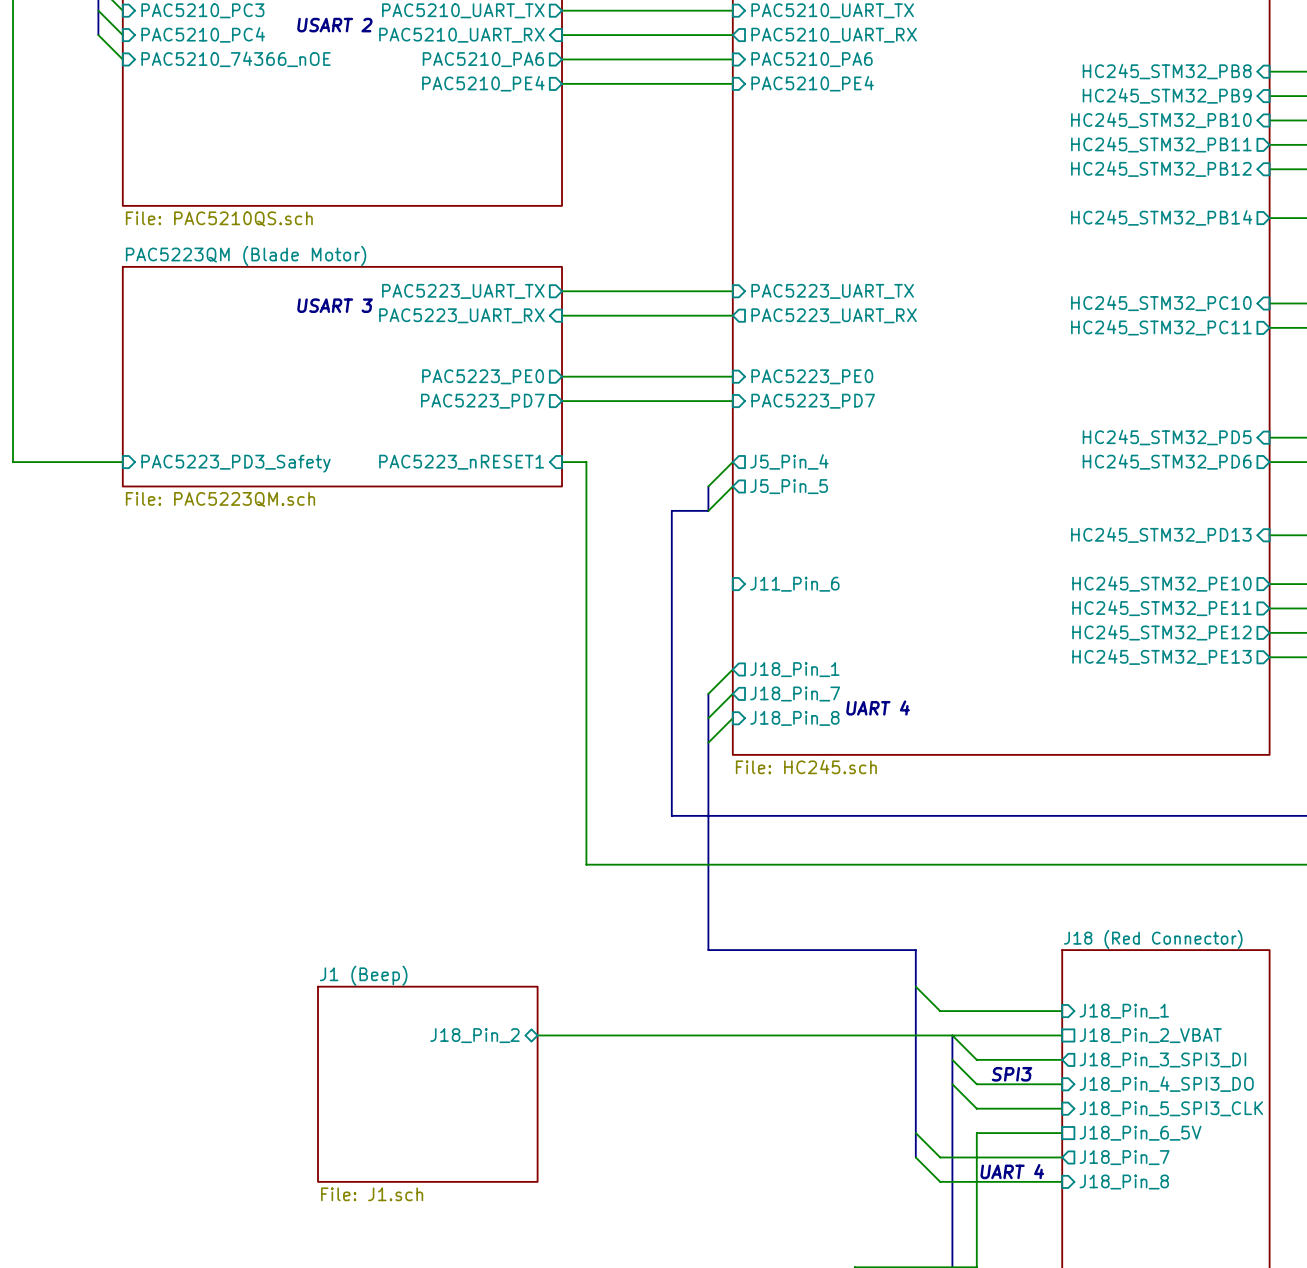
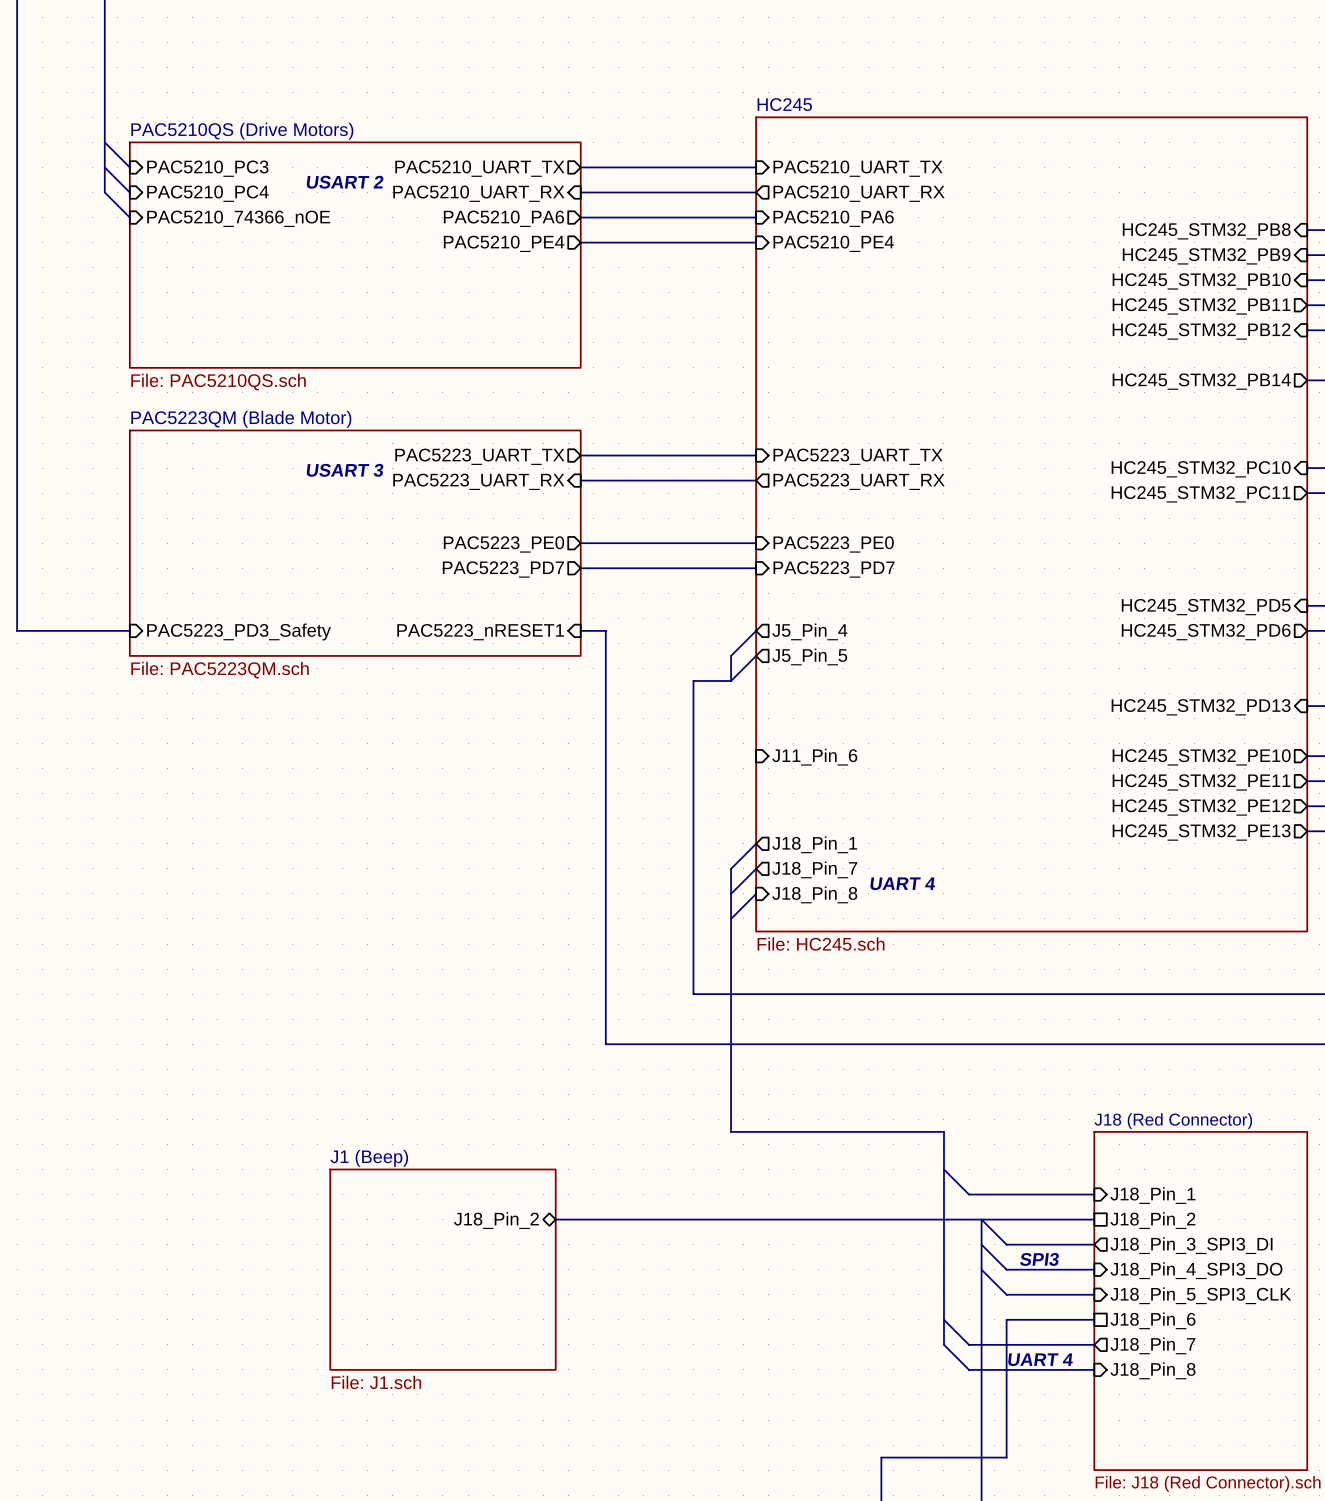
sheet pin: J18_Pin_2_VBAT (1150, 1035) -> J18_Pin_2 (1152, 1220)
sheet pin: J18_Pin_6_5V (1140, 1133) -> J18_Pin_6 (1152, 1320)

